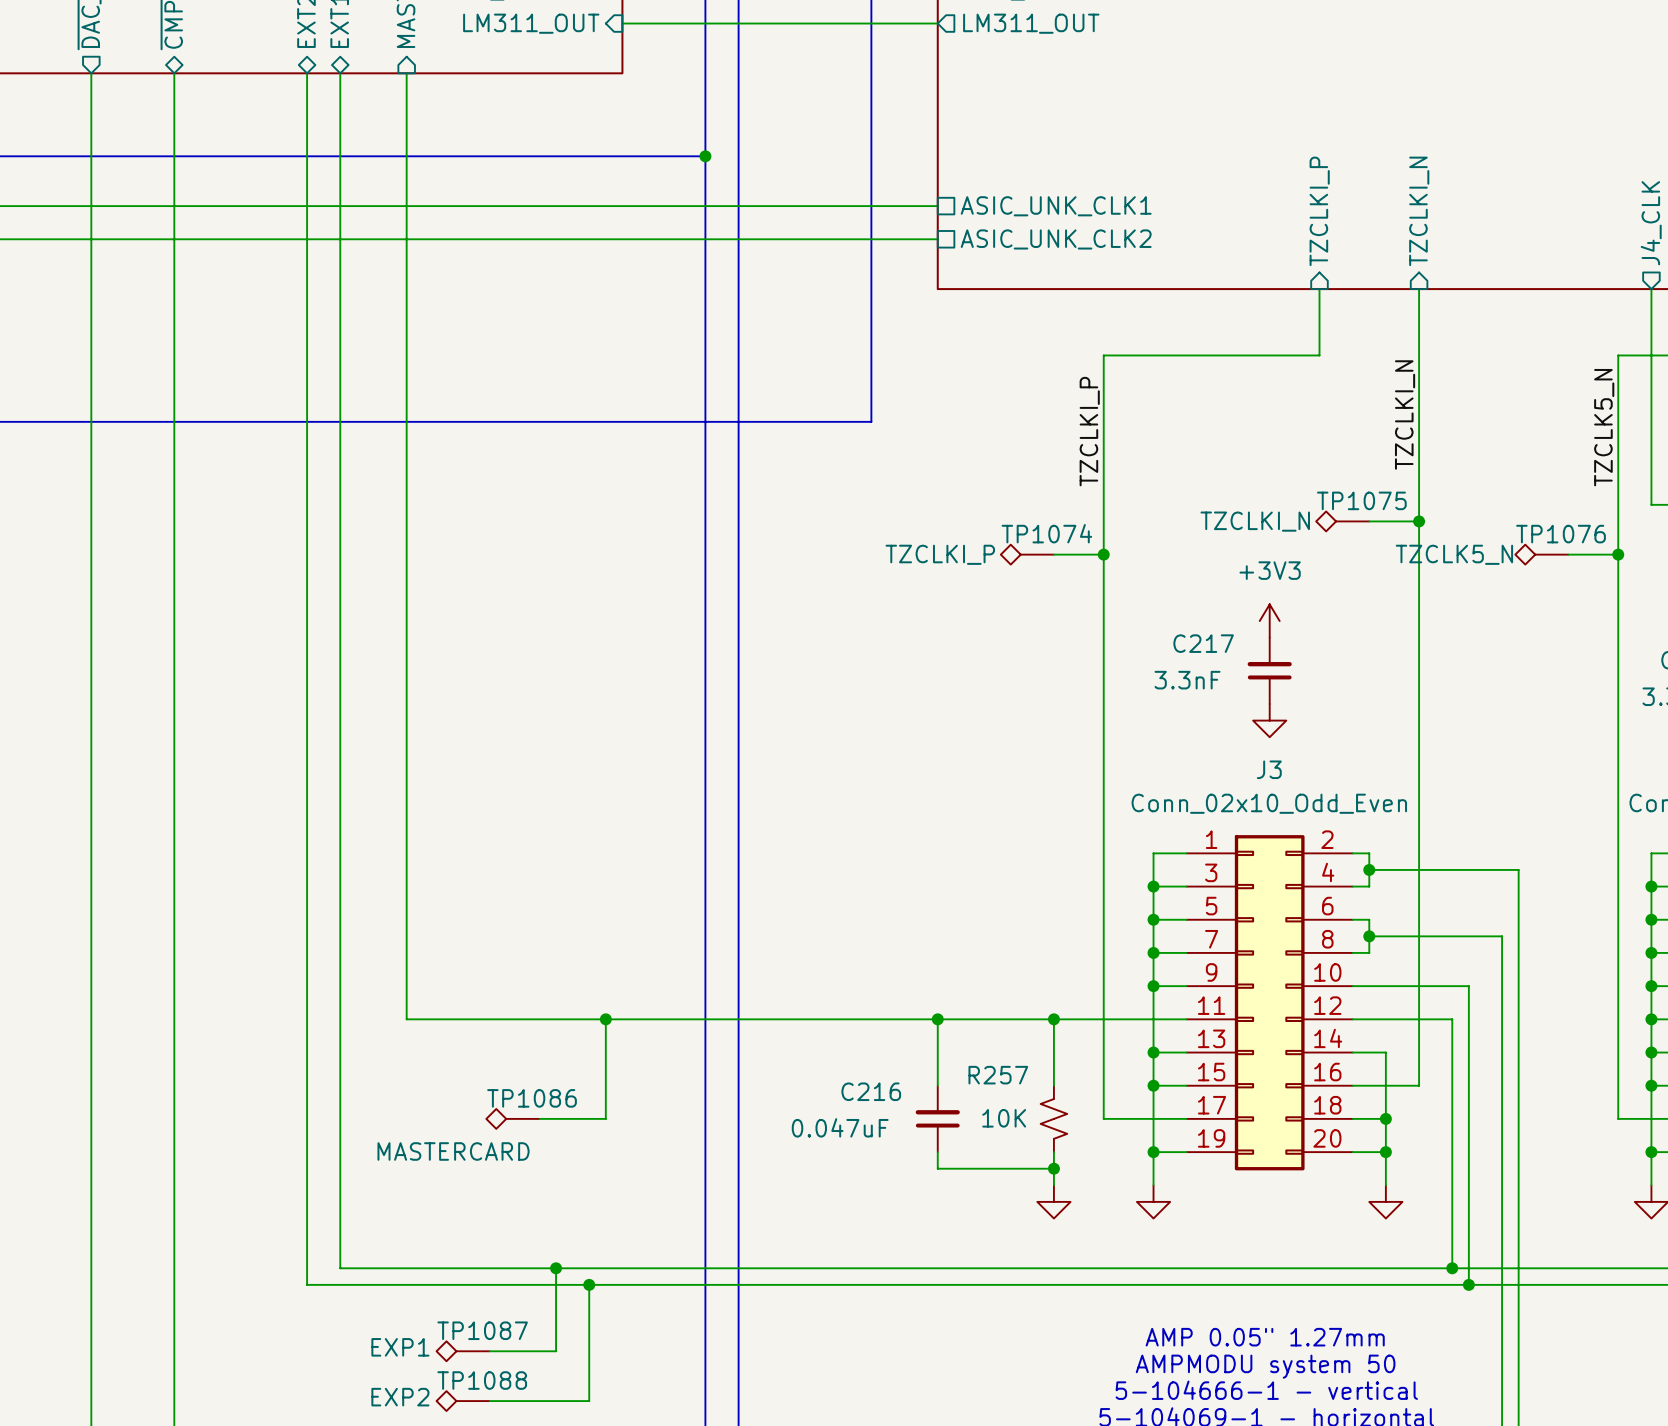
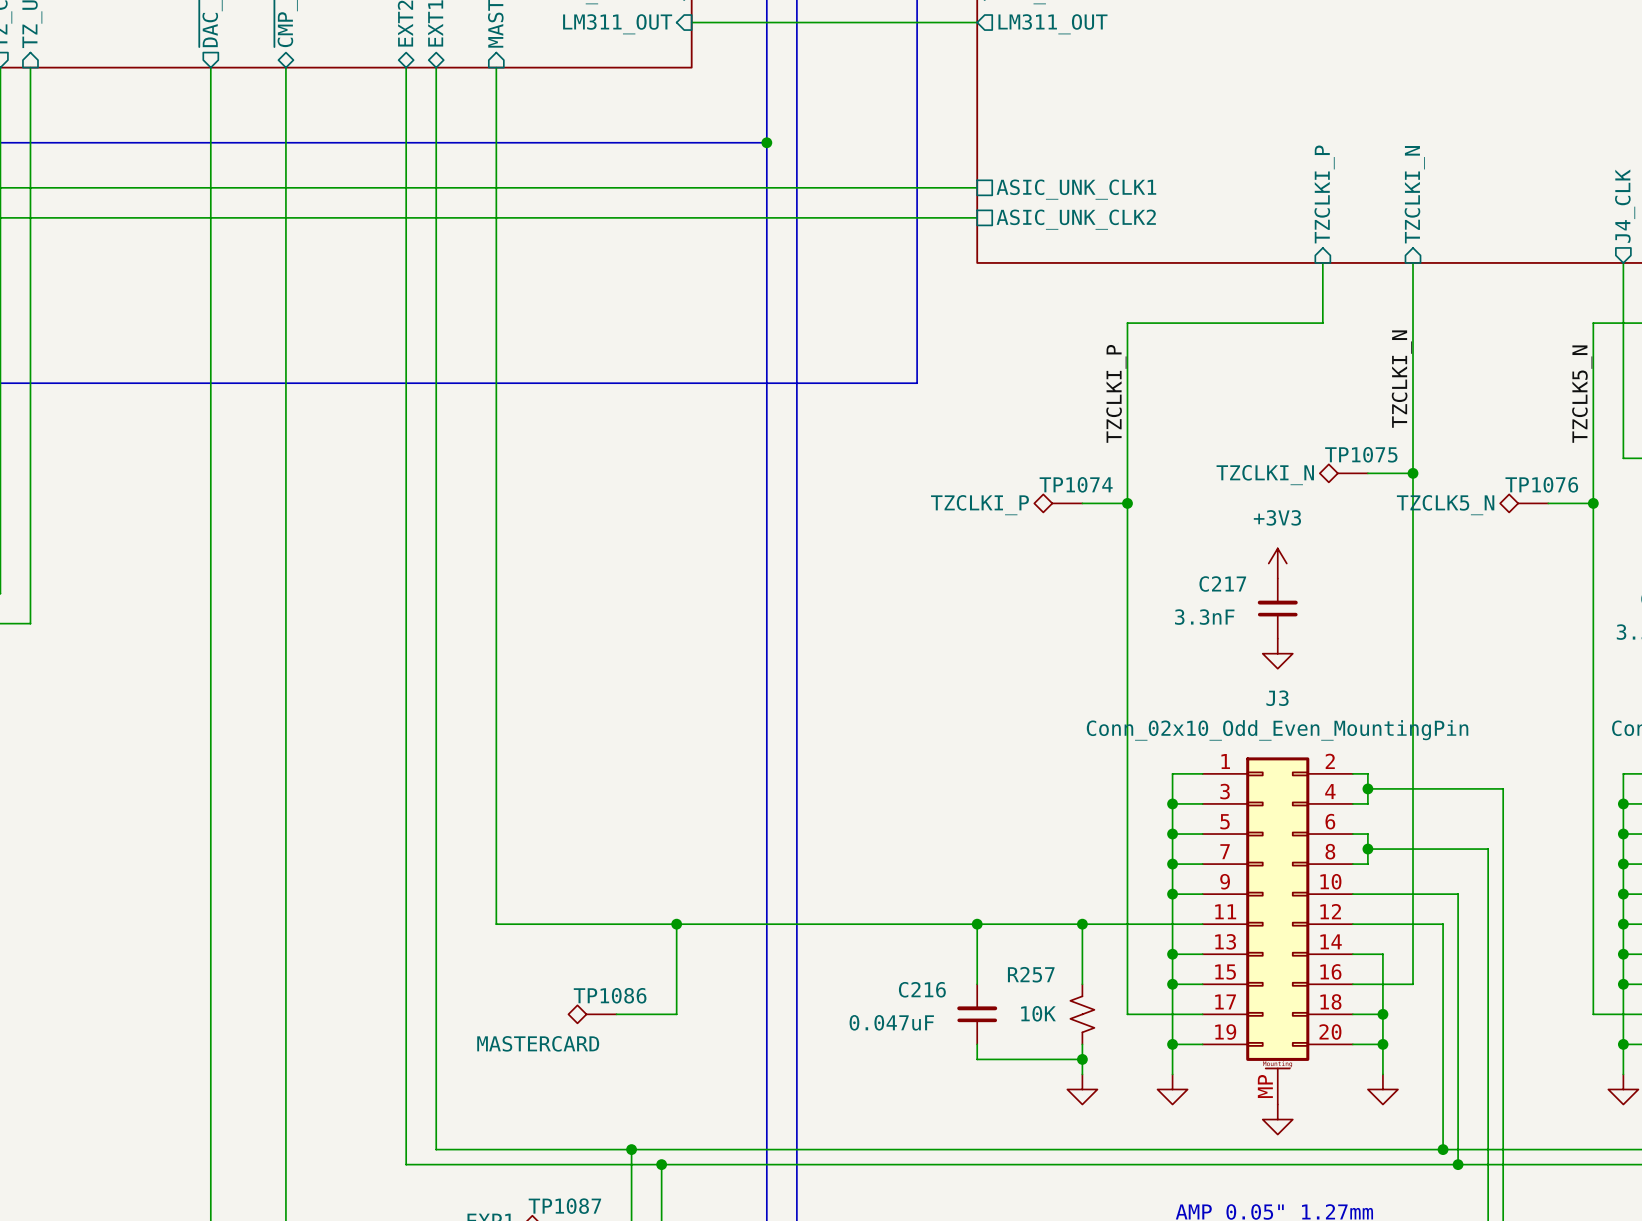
J3 value: Conn_02x10_Odd_Even (1269, 803) -> Conn_02x10_Odd_Even_MountingPin (1277, 730)
J3 symbol: [1186, 835, 1353, 1171] -> [1202, 757, 1353, 1105]
power symbol: none -> (1277, 1119)

